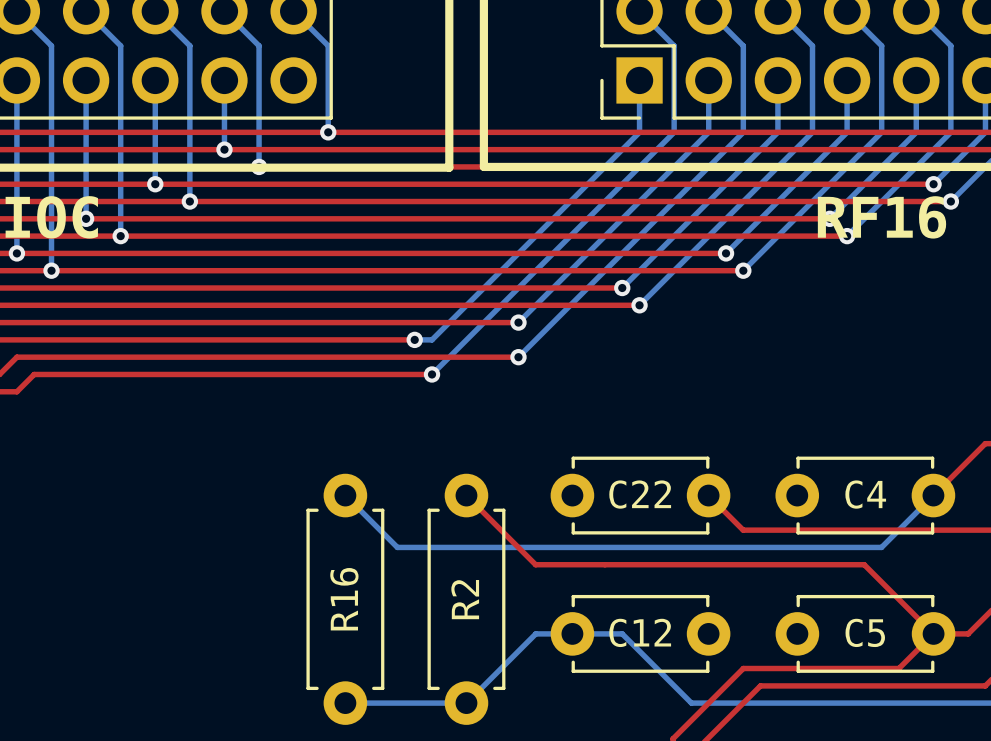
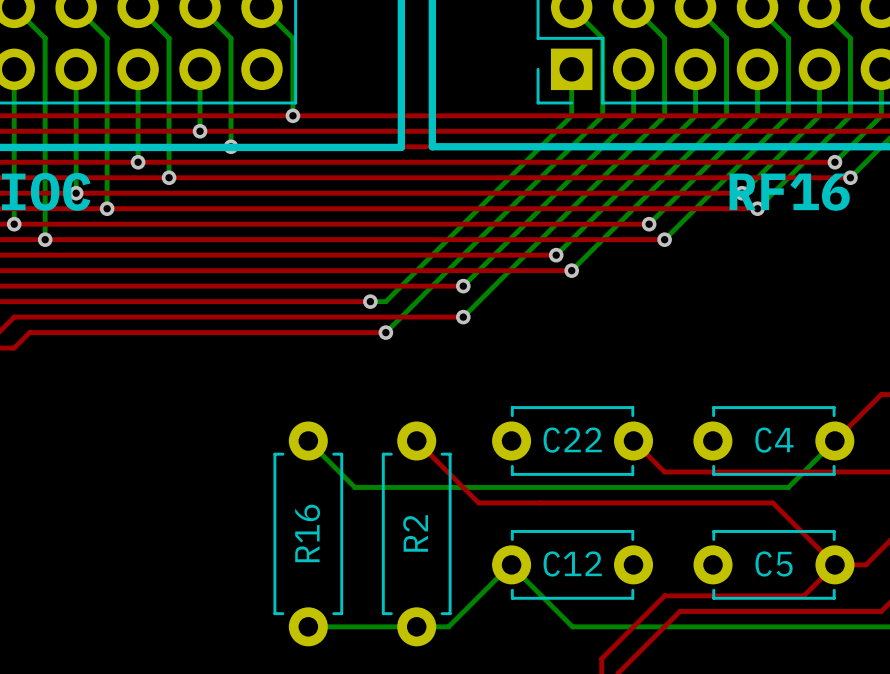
bottom track: (466, 703) (535, 633) (622, 633) (691, 703) -> (416, 626) (448, 626) (510, 564) (572, 626) (618, 626)

